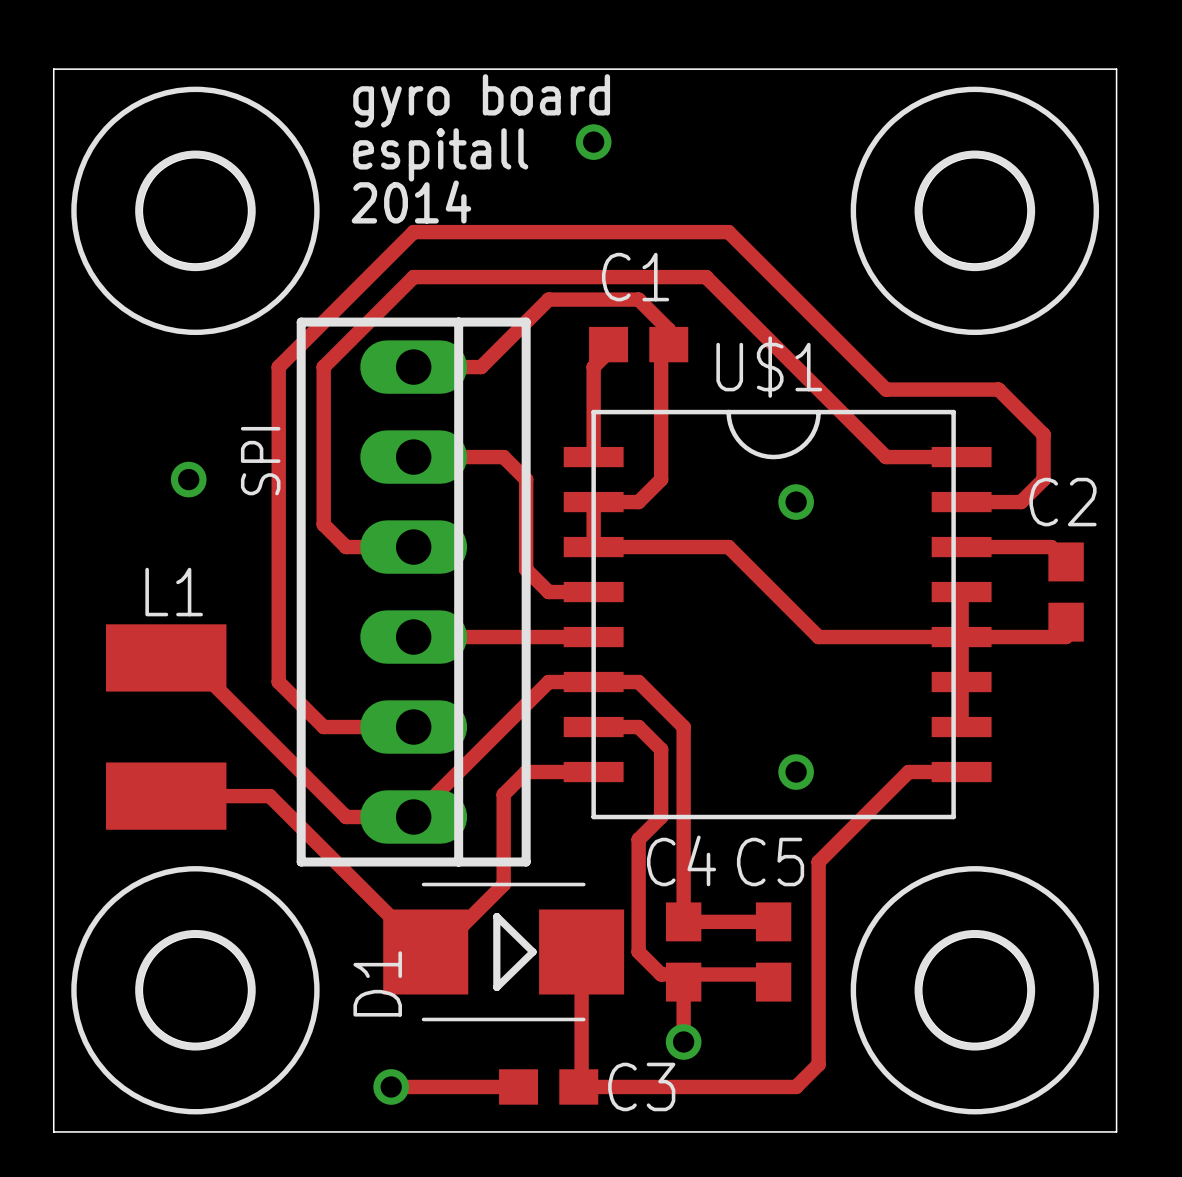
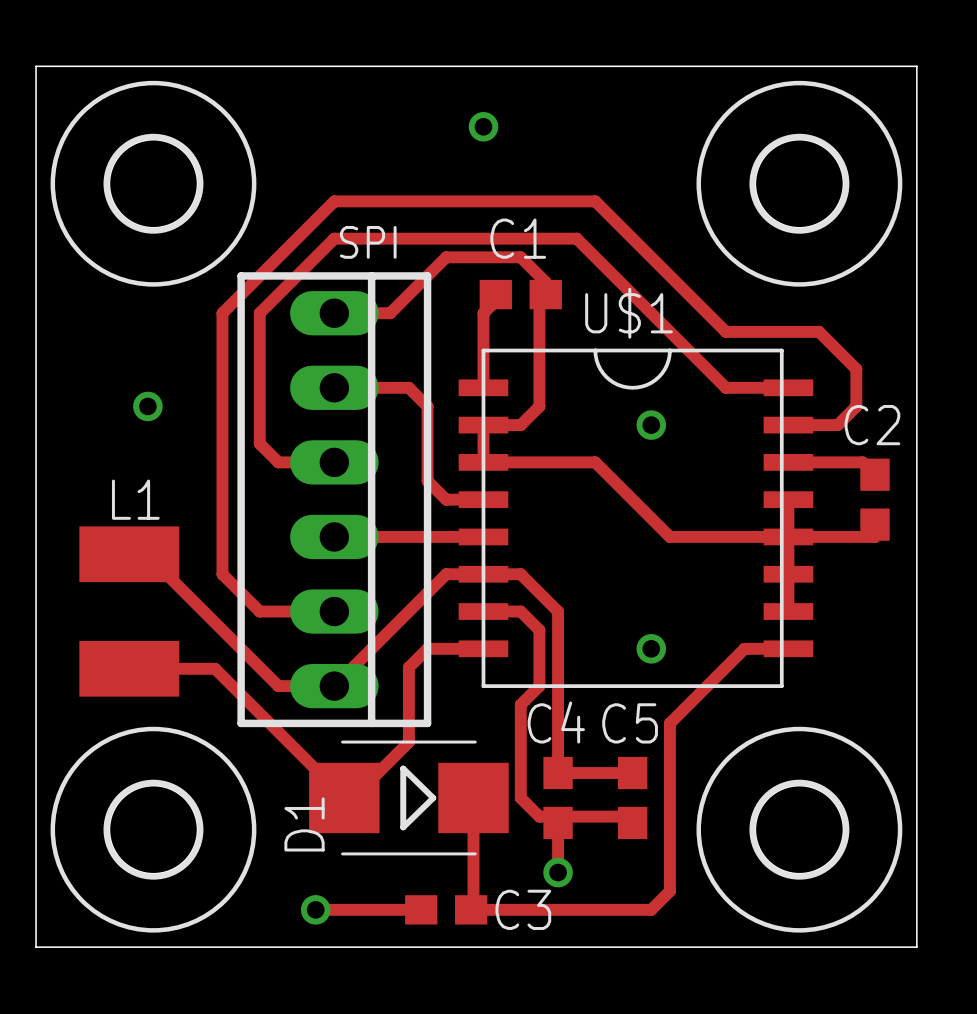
text: gyro board (481, 100) -> none
text: espitall (440, 154) -> none
text: 2014 (411, 202) -> none
SPI name rotation: 0° (260, 461) -> 90° clockwise (368, 242)
SPI name position: SPI (260, 461) -> SPI (368, 242)

